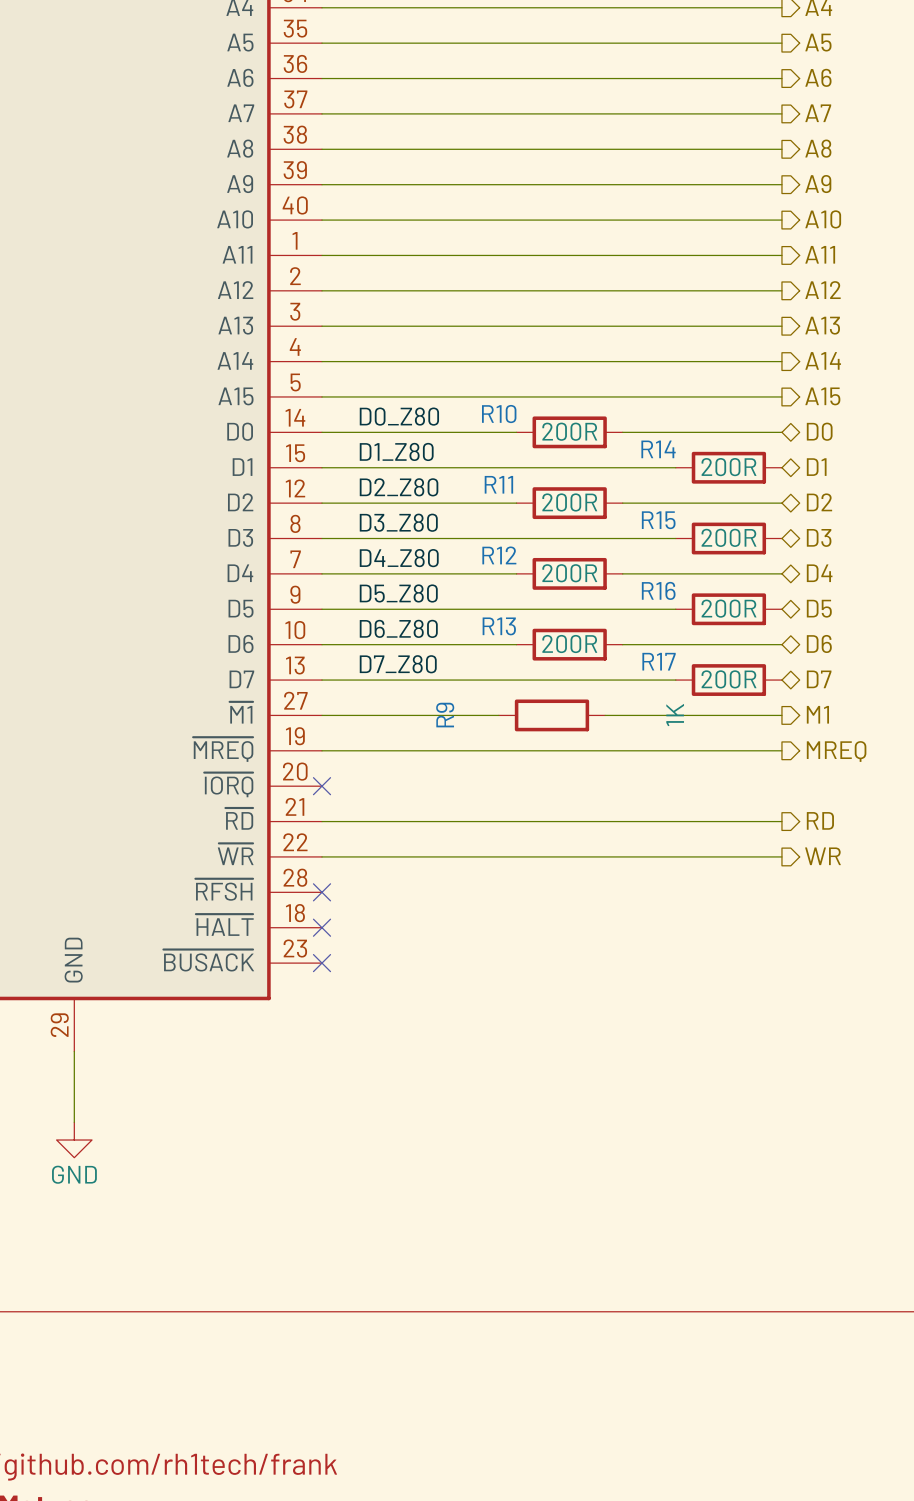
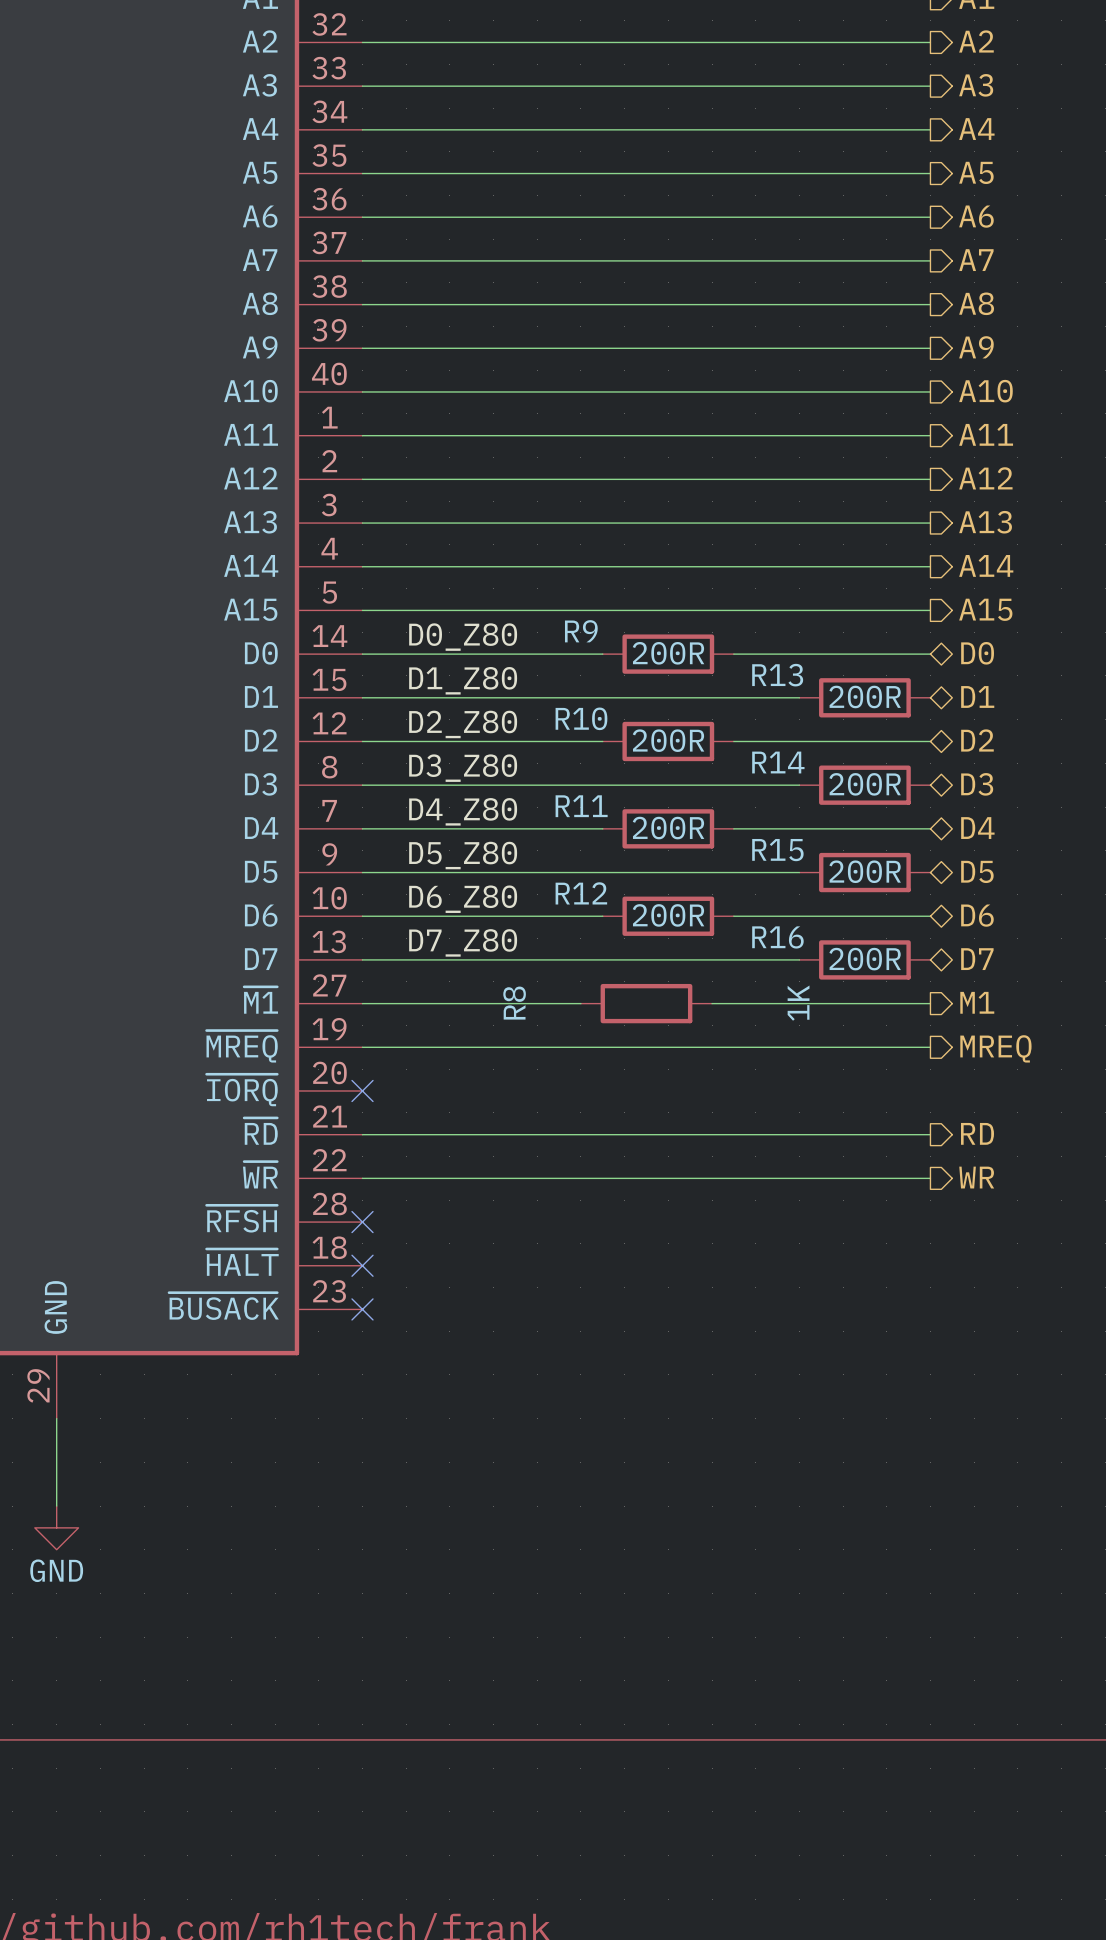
R10 name: R10 (499, 414) -> R9 (581, 631)
R14 name: R14 (658, 449) -> R13 (777, 675)
R11 name: R11 (498, 484) -> R10 (581, 718)
R15 name: R15 (658, 520) -> R14 (778, 762)
R12 name: R12 (499, 555) -> R11 (581, 806)
R16 name: R16 (658, 590) -> R15 (777, 850)
R13 name: R13 (499, 626) -> R12 (581, 893)
R17 name: R17 (659, 661) -> R16 (777, 937)
R9 name: R9 (445, 715) -> R8 (514, 1003)

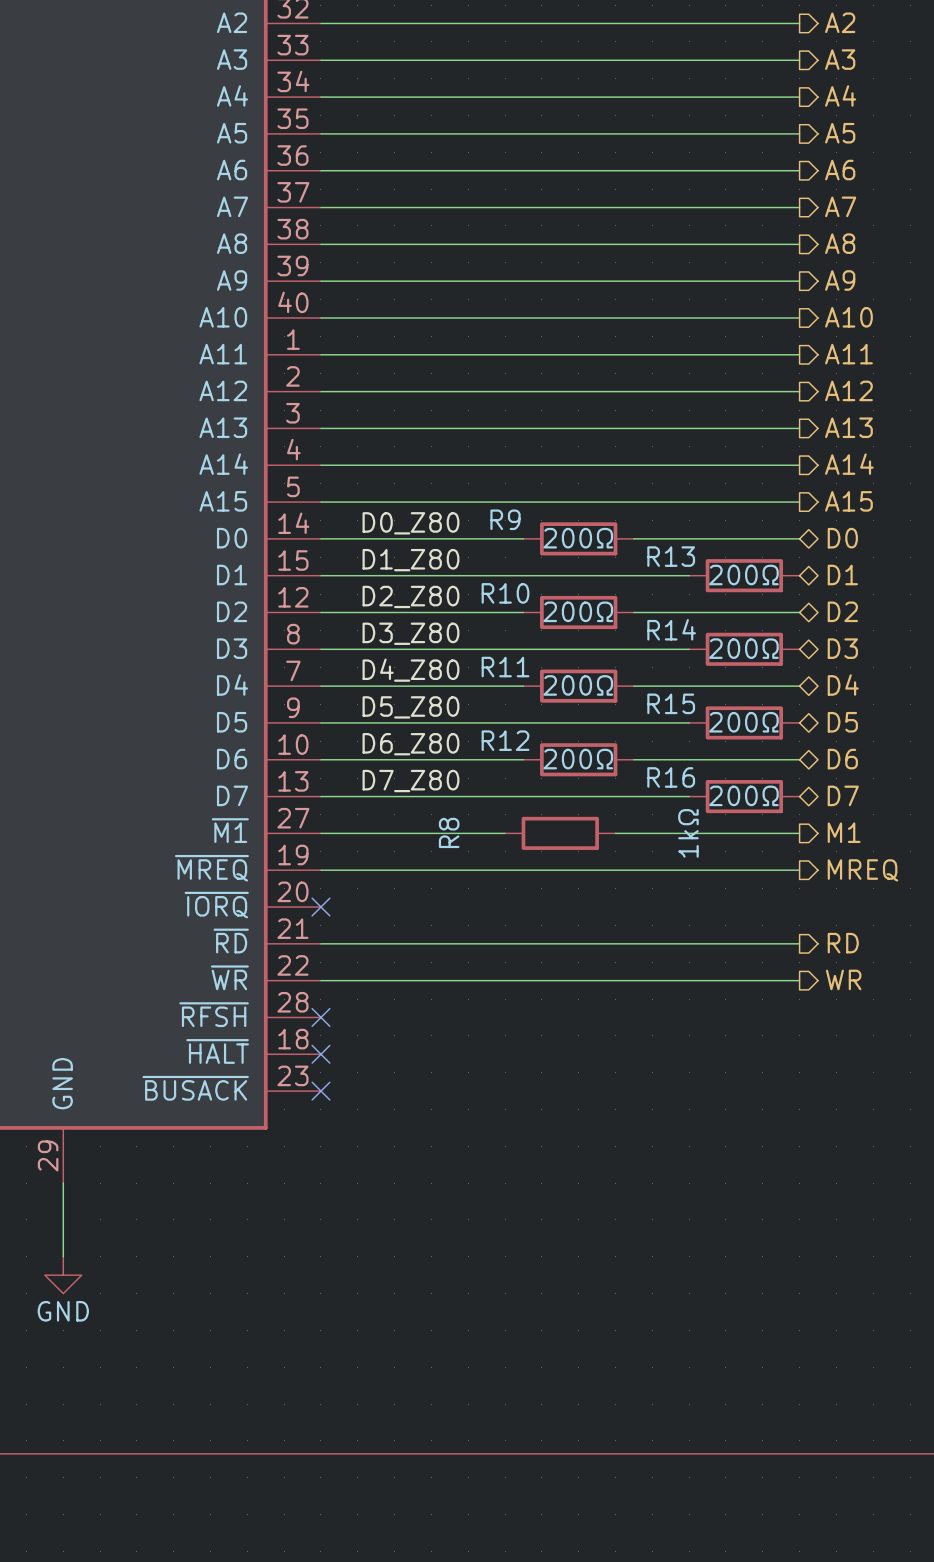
R9 value: 200R (668, 653) -> 200Ω (578, 538)
R13 value: 200R (865, 696) -> 200Ω (743, 574)
R10 value: 200R (668, 740) -> 200Ω (578, 611)
R14 value: 200R (865, 784) -> 200Ω (743, 648)
R11 value: 200R (668, 828) -> 200Ω (578, 685)
R15 value: 200R (865, 871) -> 200Ω (743, 722)
R12 value: 200R (668, 915) -> 200Ω (578, 759)
R16 value: 200R (865, 959) -> 200Ω (743, 795)
R8 value: 1K (798, 1003) -> 1kΩ (688, 833)

